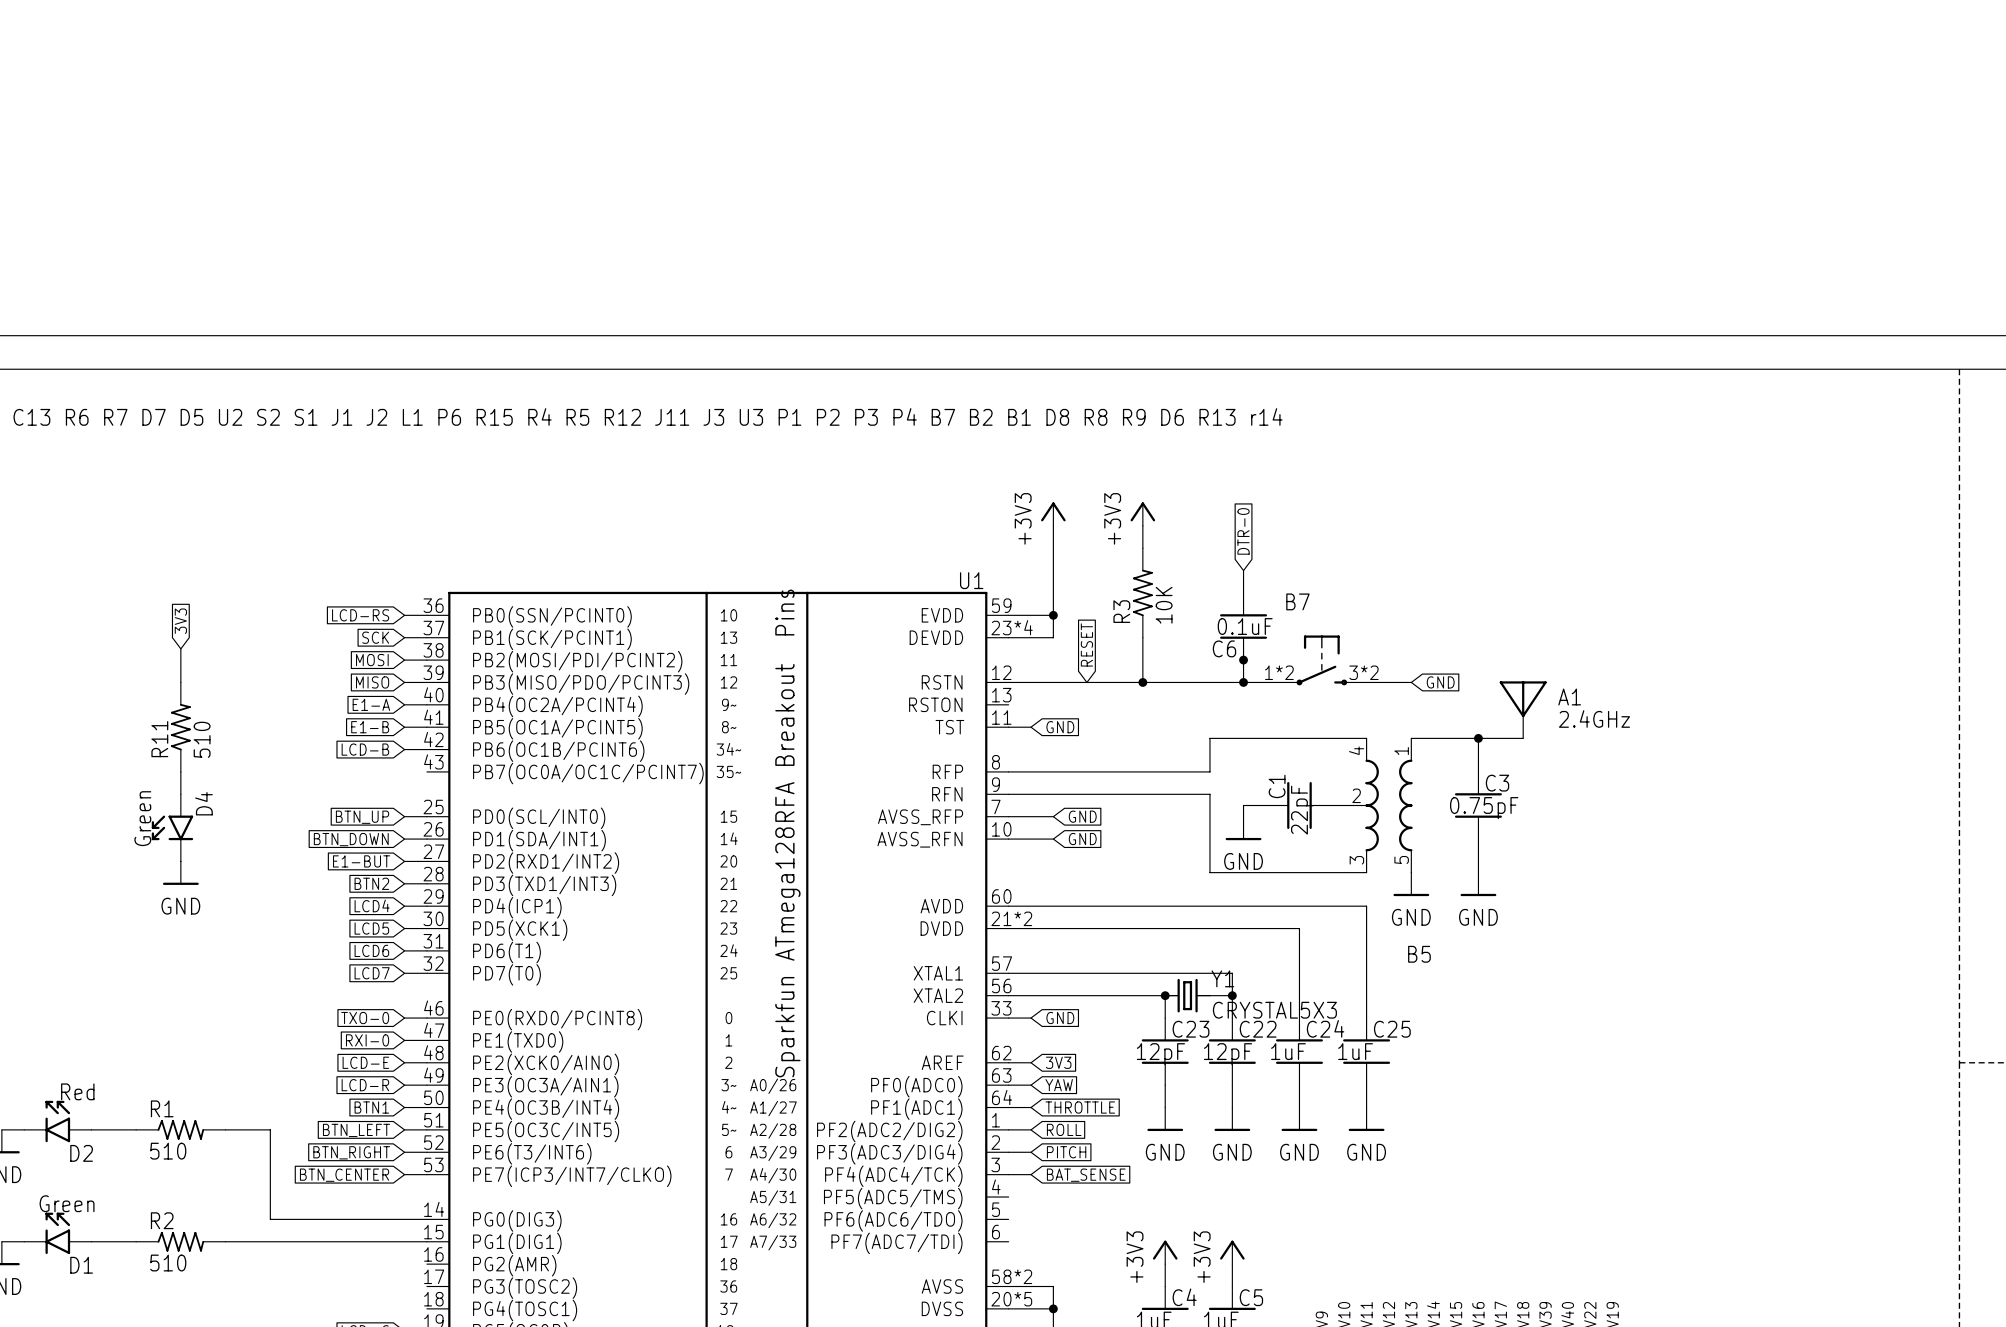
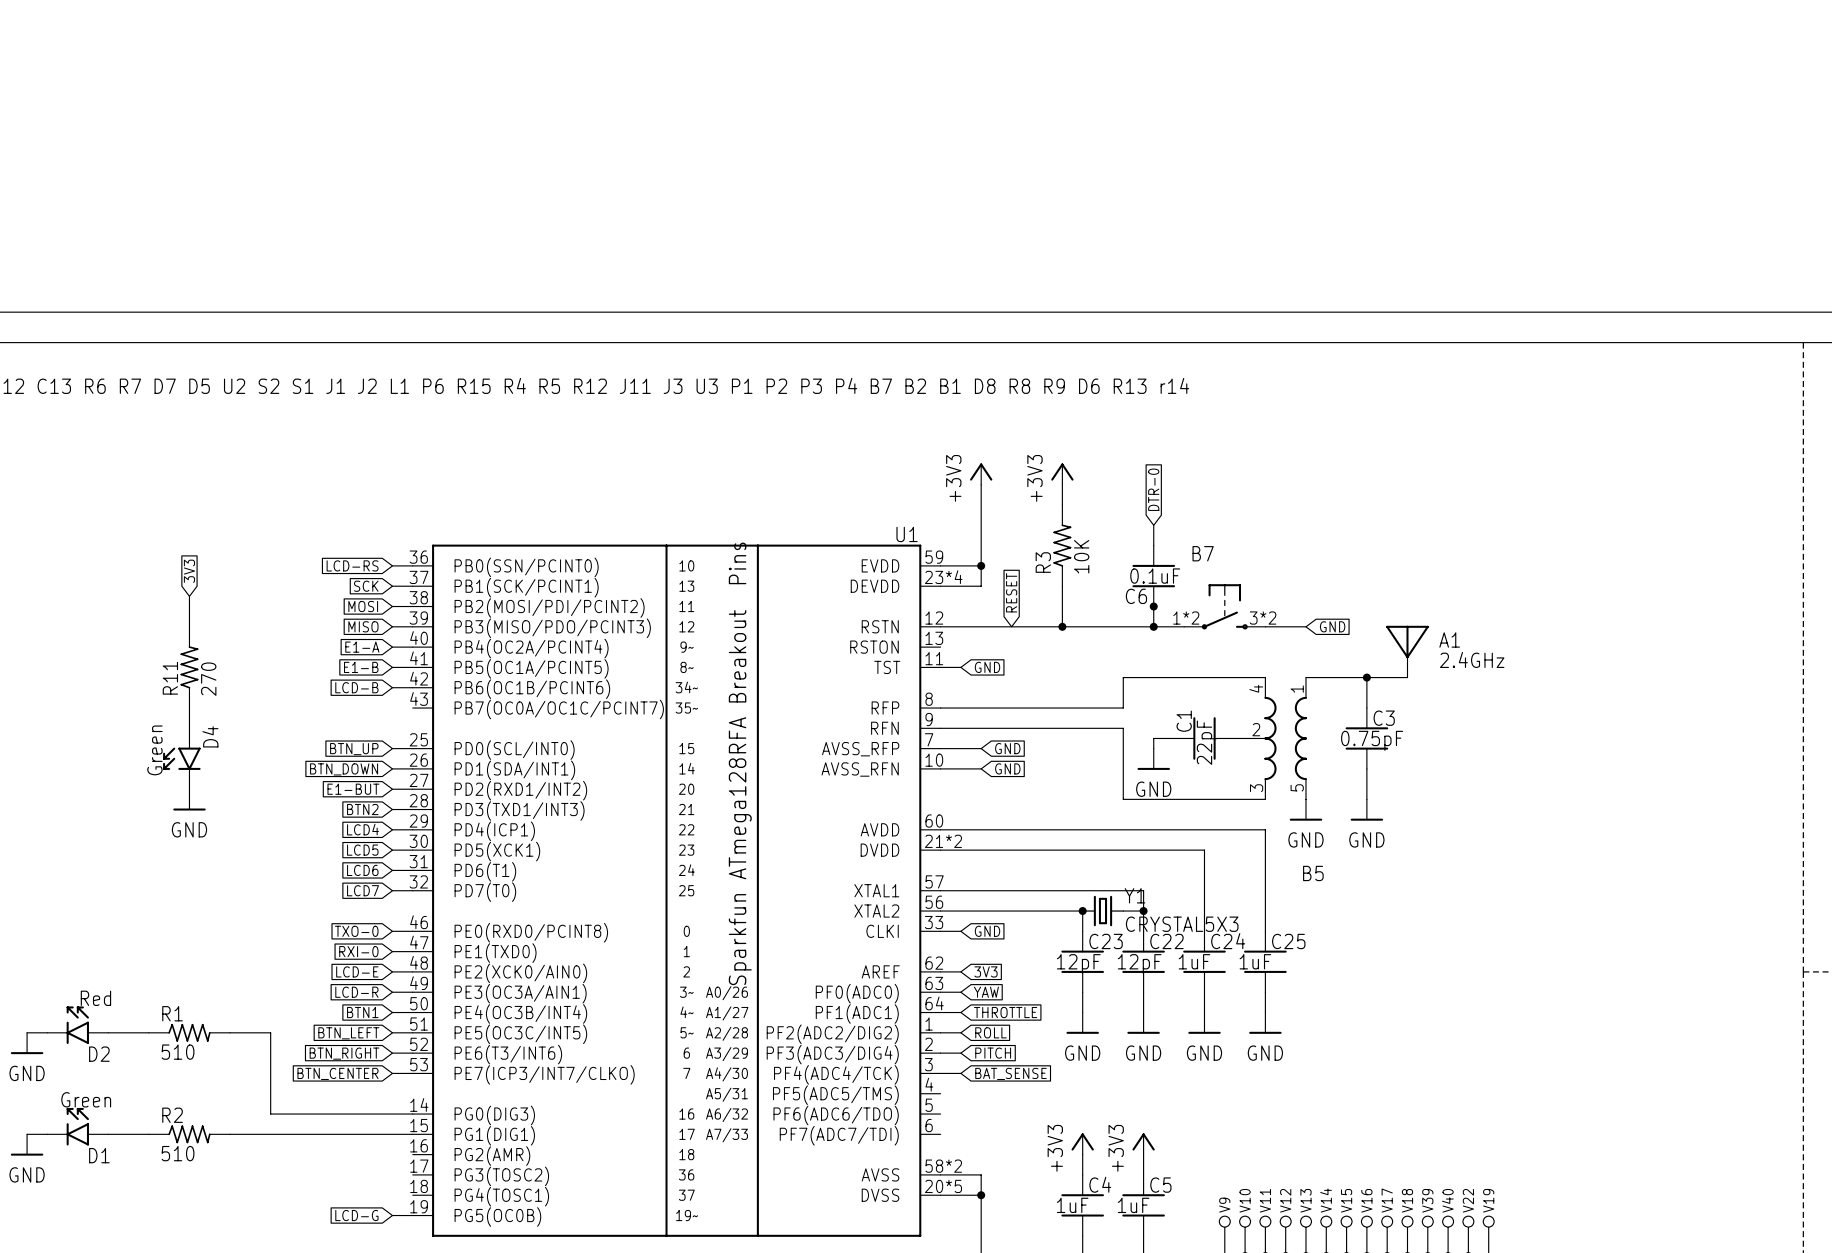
R11 value: 510 (202, 739) -> 270 (208, 679)

